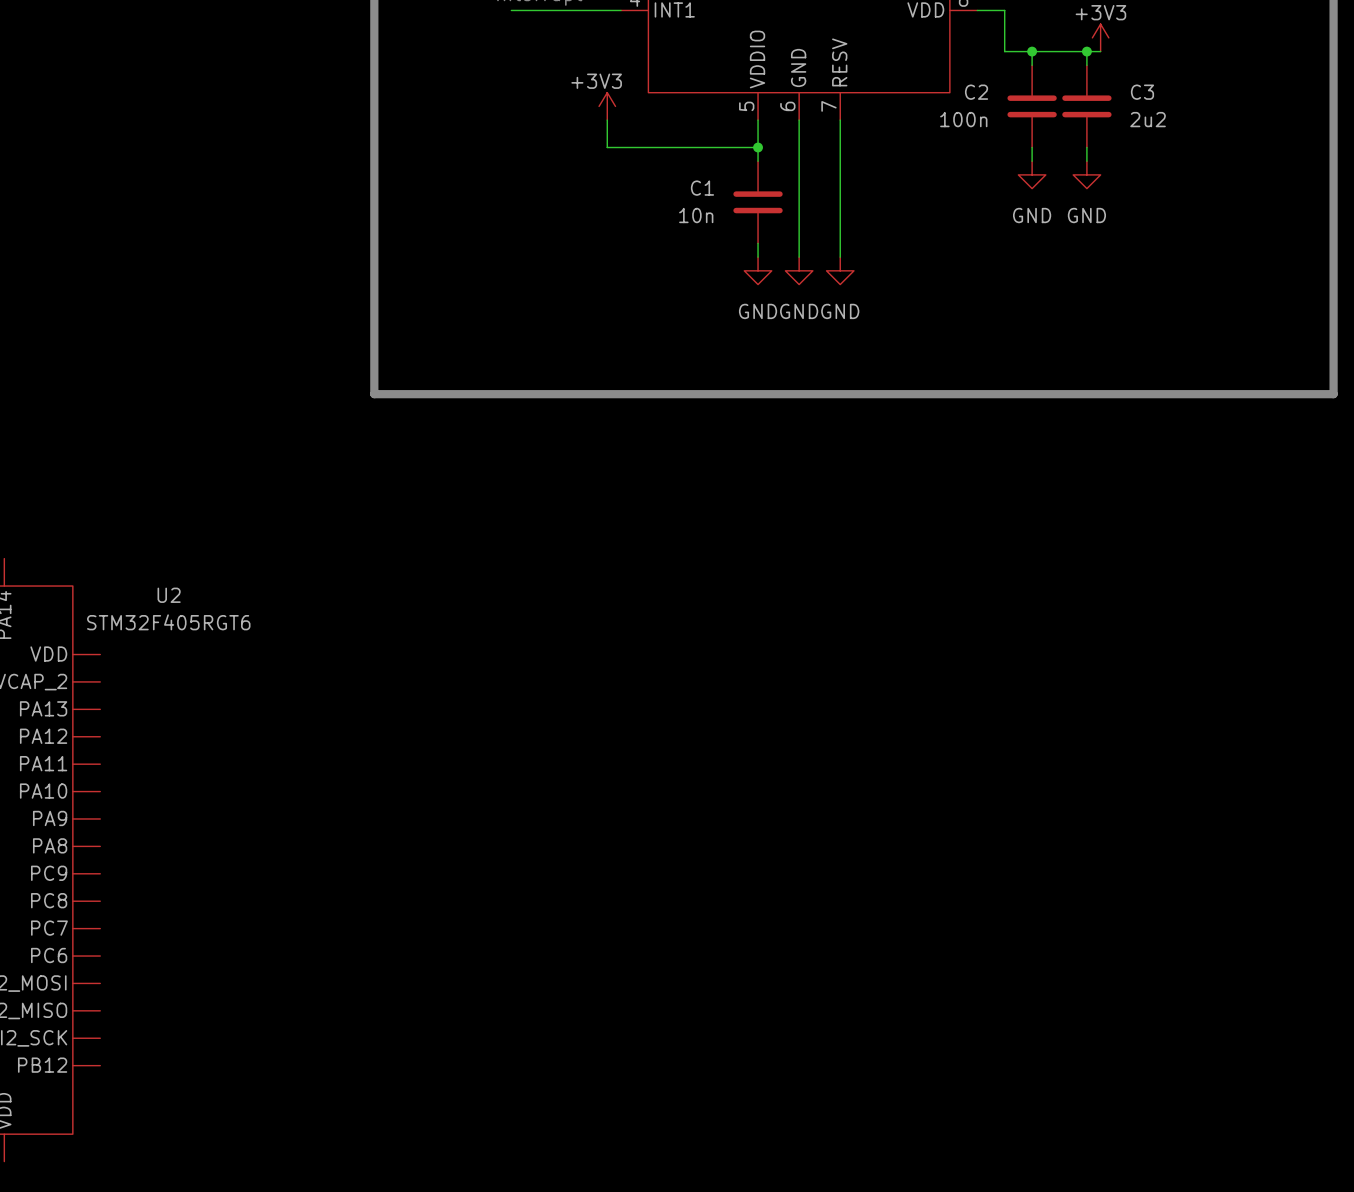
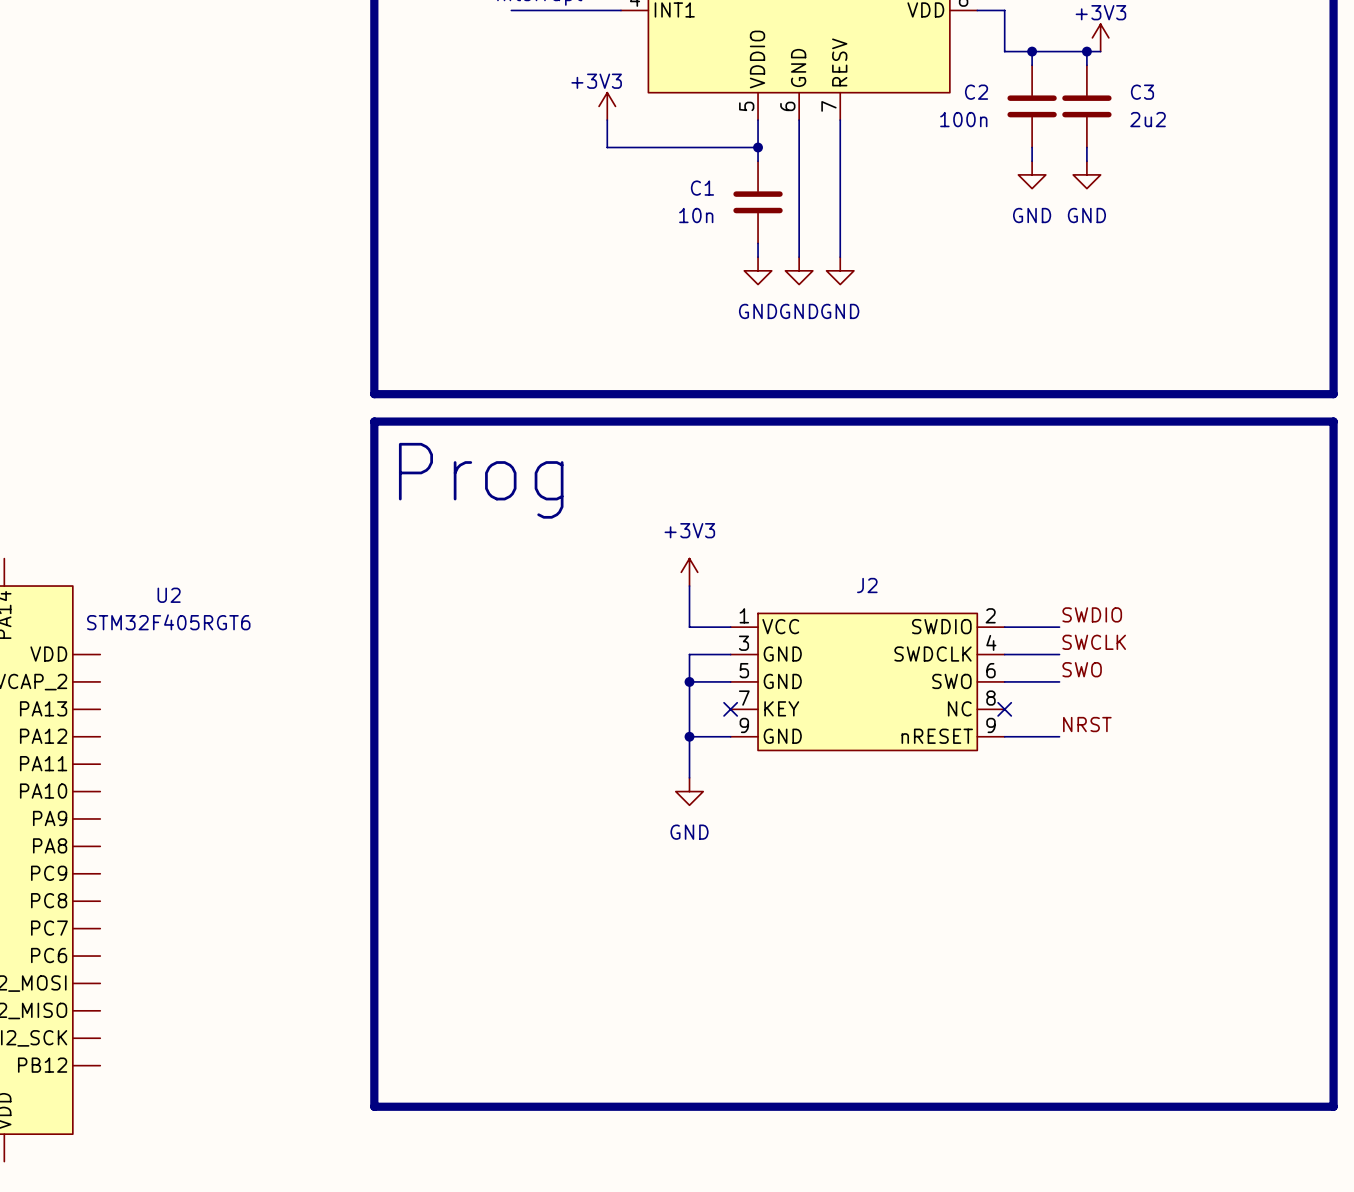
line: none -> (374, 421) (1333, 421) (1333, 1106) (374, 1106) (374, 421)
text: none -> Prog (481, 480)
power symbol: none -> +3V3 (689, 572)
wire: none -> (689, 586) (689, 627) (730, 627)
label: none -> SWDIO (1092, 614)
wire: none -> (1004, 627) (1059, 627)
label: none -> SWCLK (1094, 642)
wire: none -> (730, 654) (689, 654) (689, 777)
wire: none -> (1004, 654) (1059, 654)
label: none -> SWO (1082, 669)
wire: none -> (689, 681) (730, 681)
junction: none -> (689, 681)
J2: none -> (867, 681)
wire: none -> (1004, 681) (1059, 681)
no-connect mark: none -> (730, 709)
no-connect mark: none -> (1004, 709)
label: none -> NRST (1087, 724)
wire: none -> (689, 736) (730, 736)
junction: none -> (689, 736)
wire: none -> (1004, 736) (1059, 736)
power symbol: none -> GND (689, 791)

